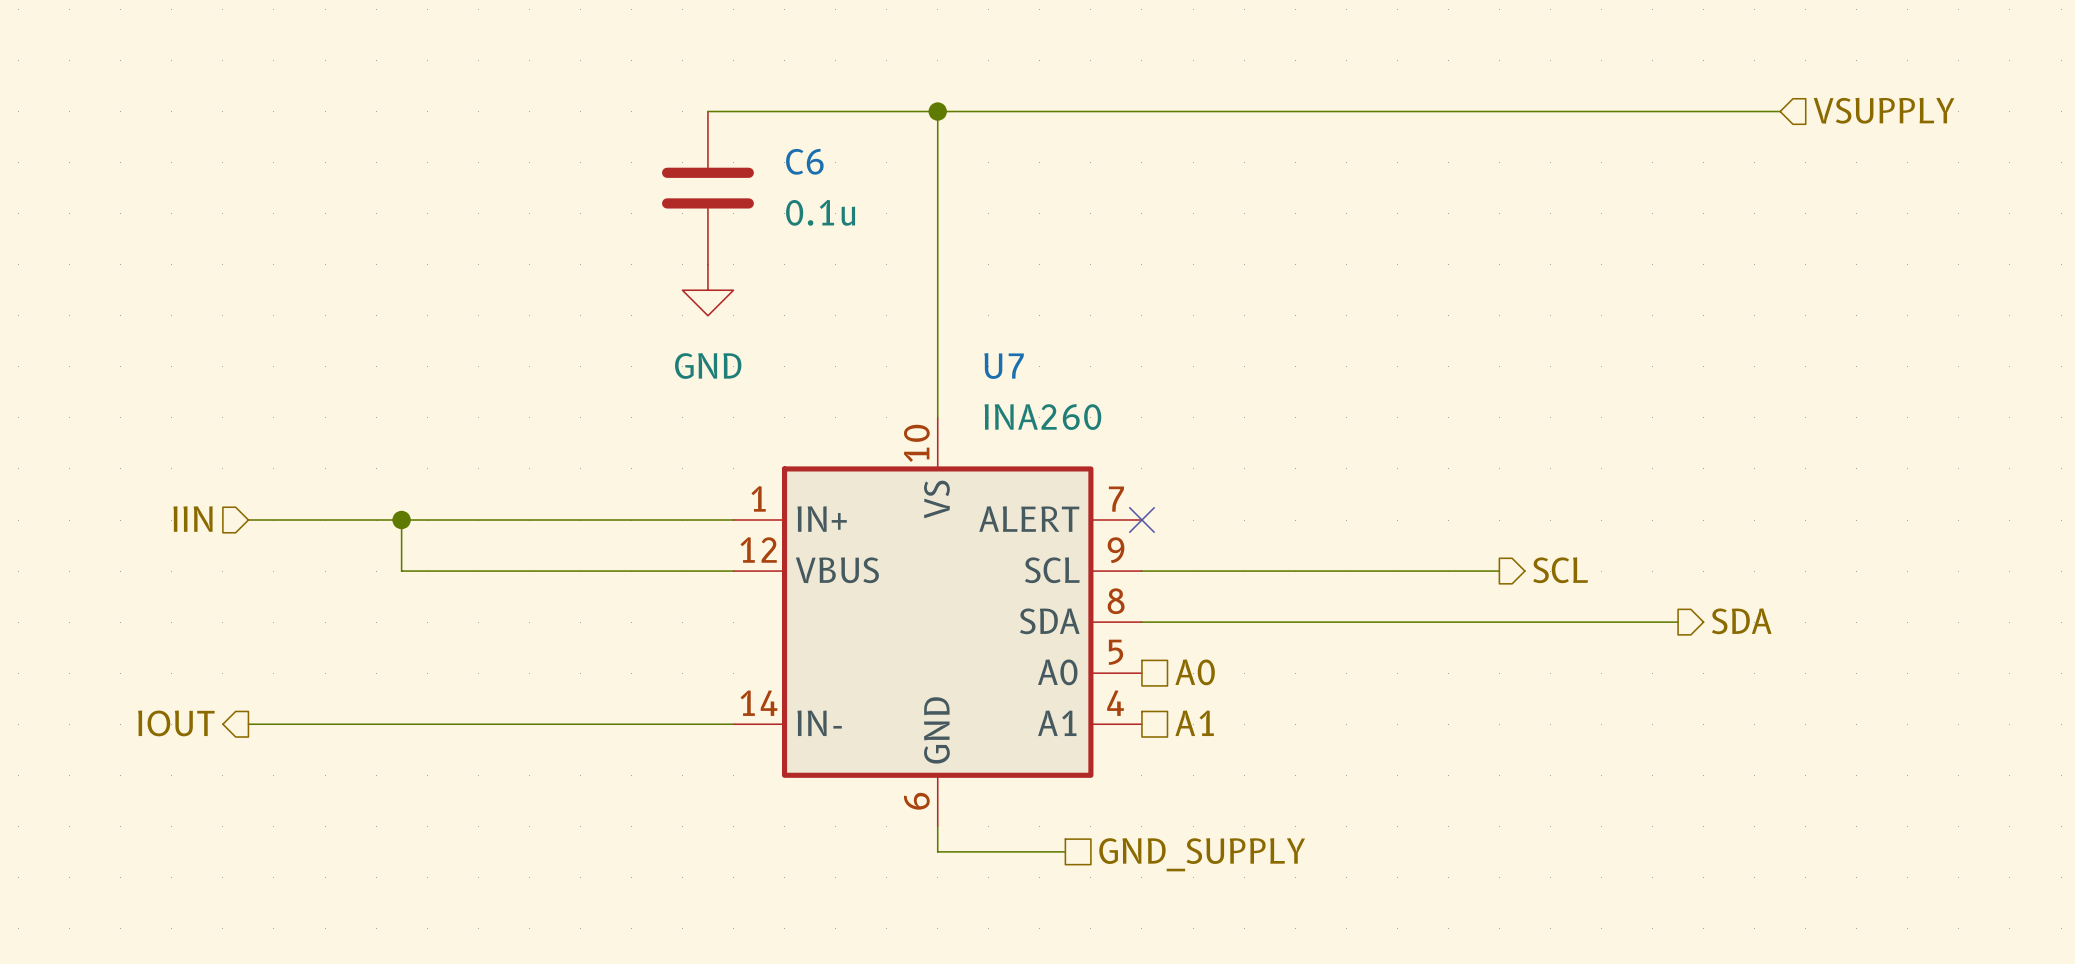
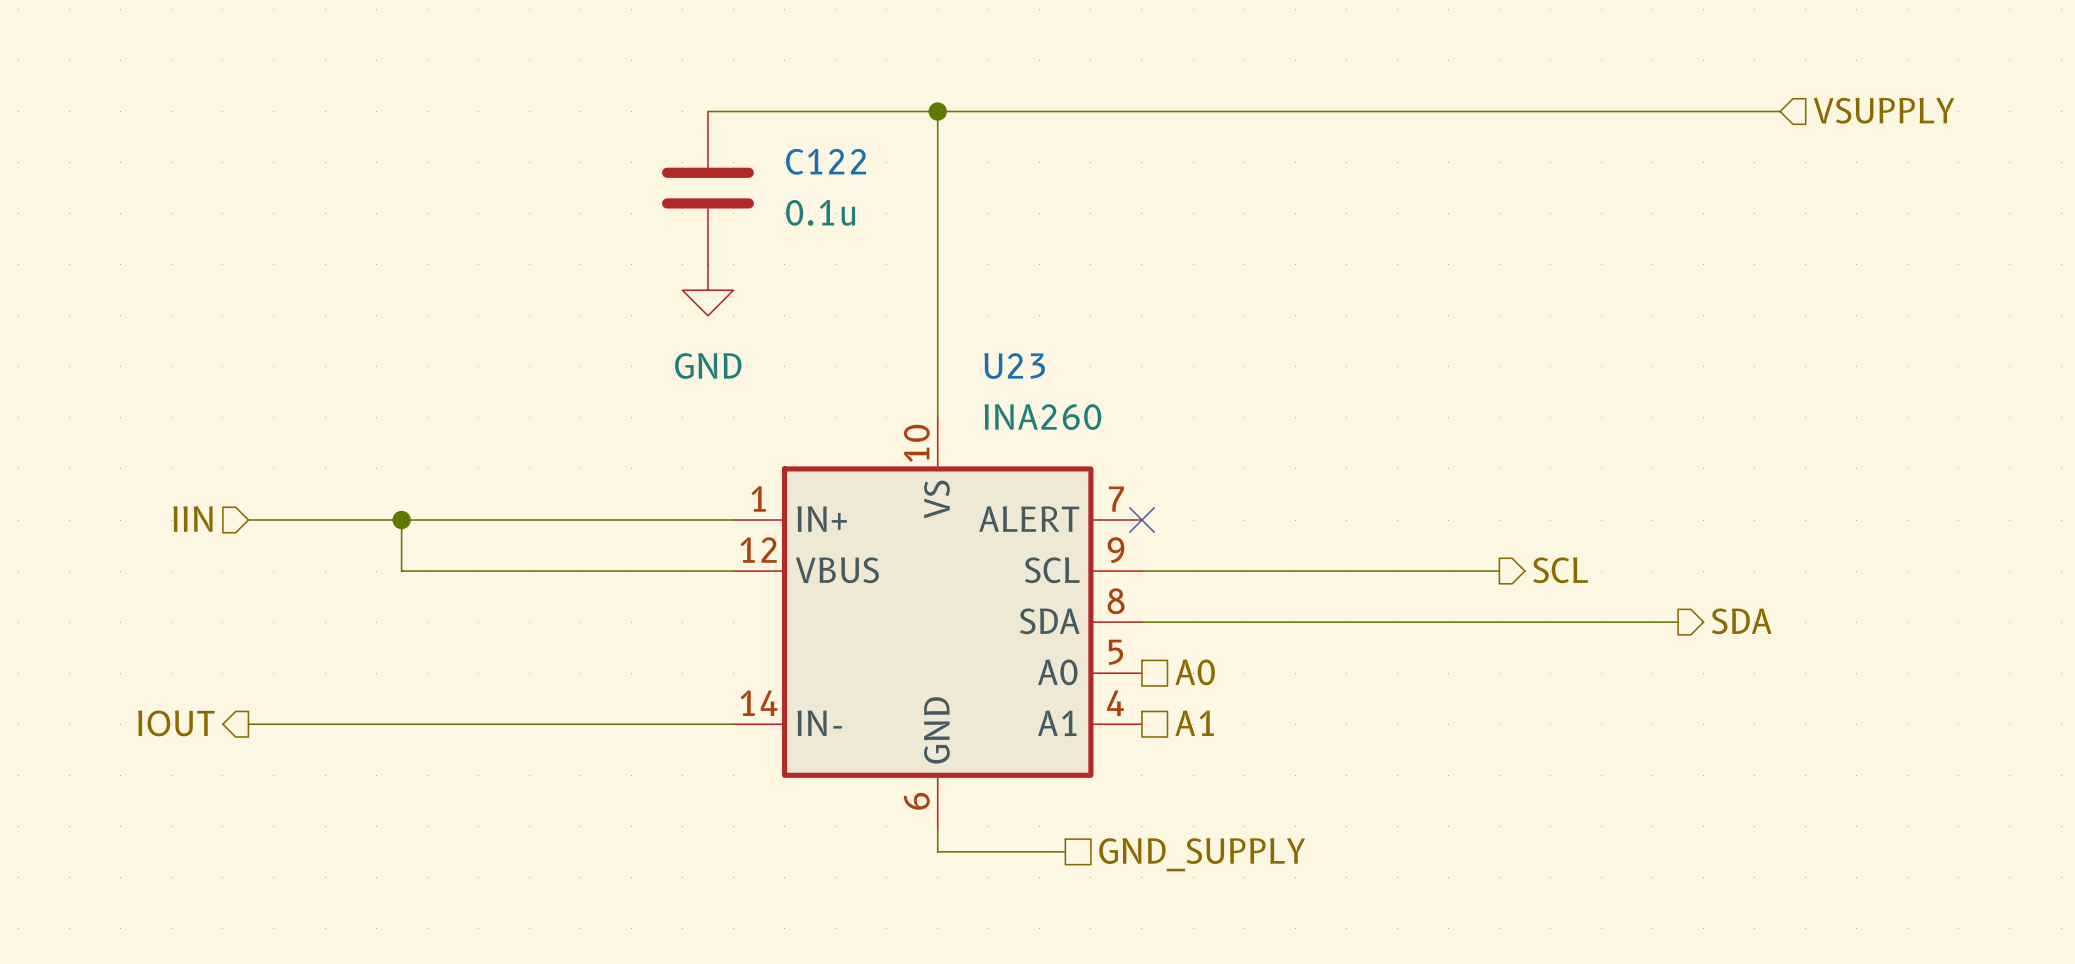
C6 name: C6 (804, 161) -> C122 (826, 161)
U7 name: U7 (1004, 366) -> U23 (1014, 366)

